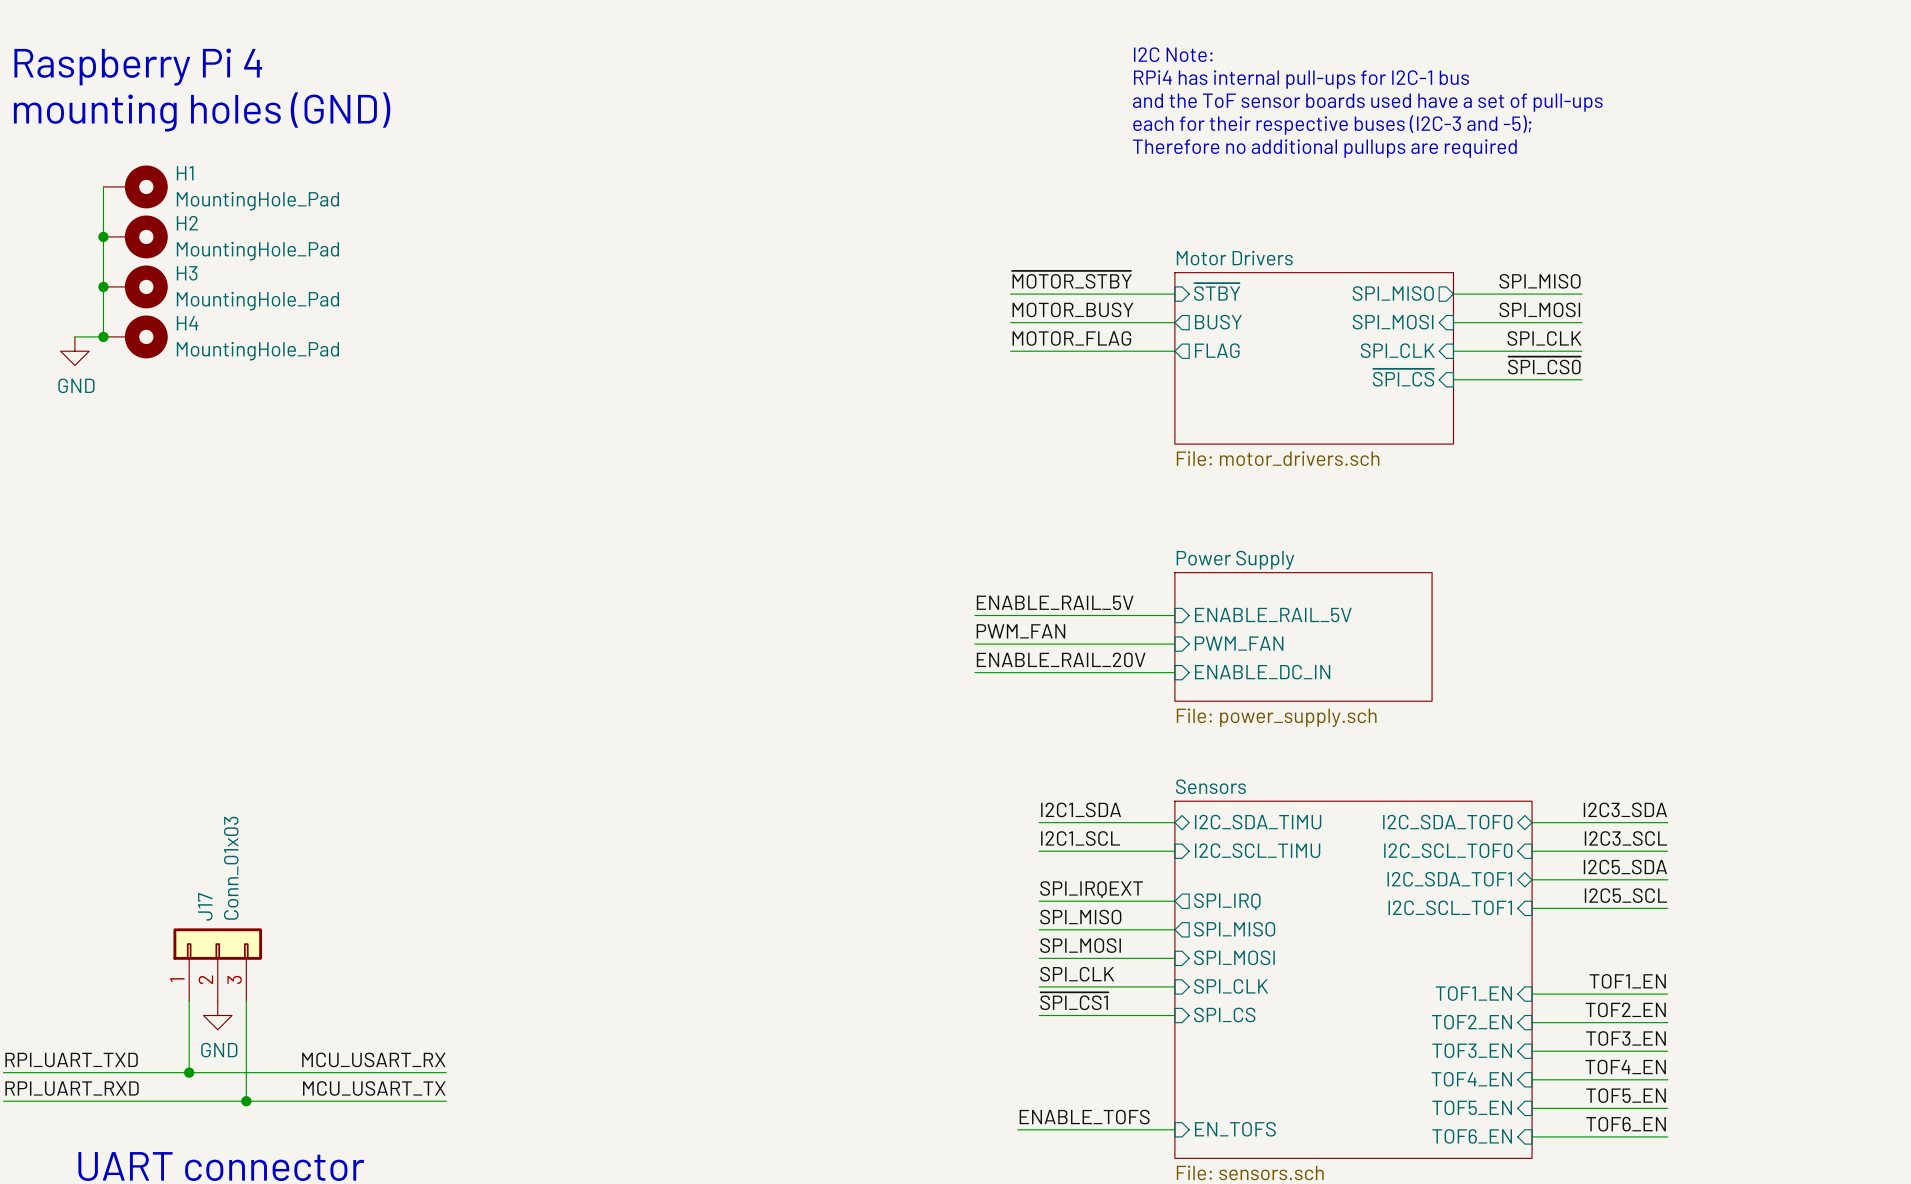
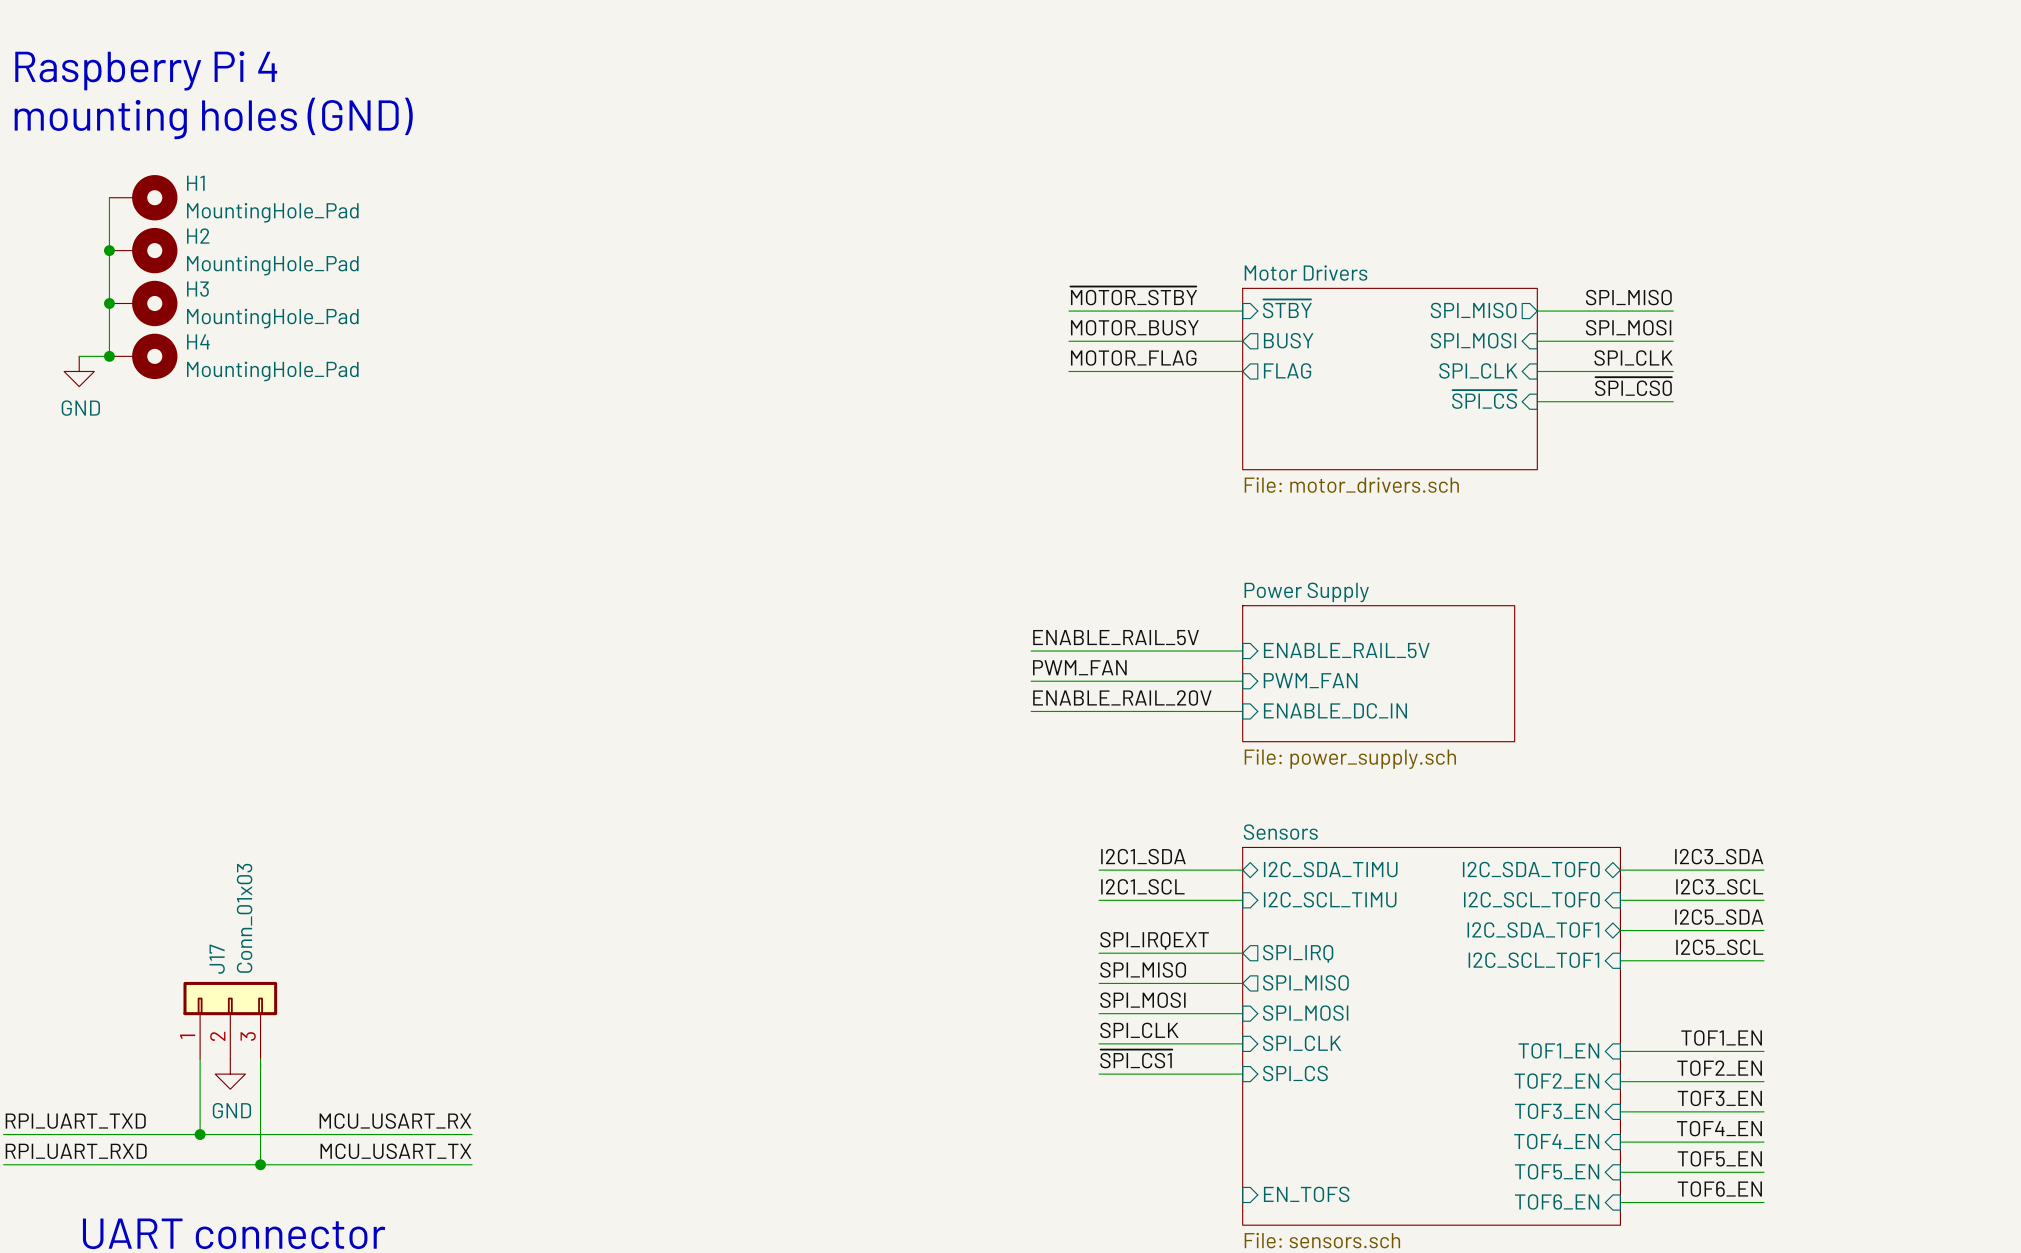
text: I2C Note: (1173, 54) -> none
text: RPi4 has internal pull-ups for I2C-1 bus (1301, 79) -> none
text: and the ToF sensor boards used have a set of pull-ups (1367, 102) -> none
text: each for their respective buses (I2C-3 and -5); (1332, 125) -> none
text: Therefore no additional pullups are required (1324, 148) -> none
label: ENABLE_TOFS (1084, 1117) -> none
wire: (1017, 1129) (1174, 1129) -> none

